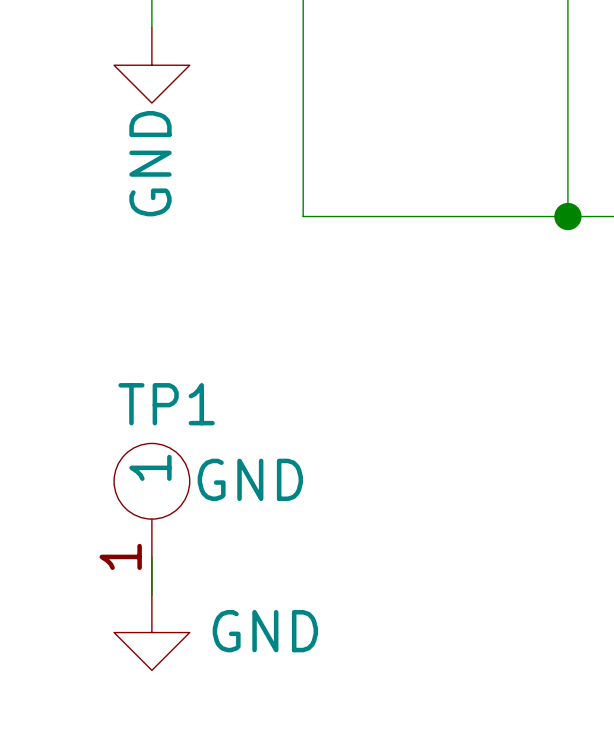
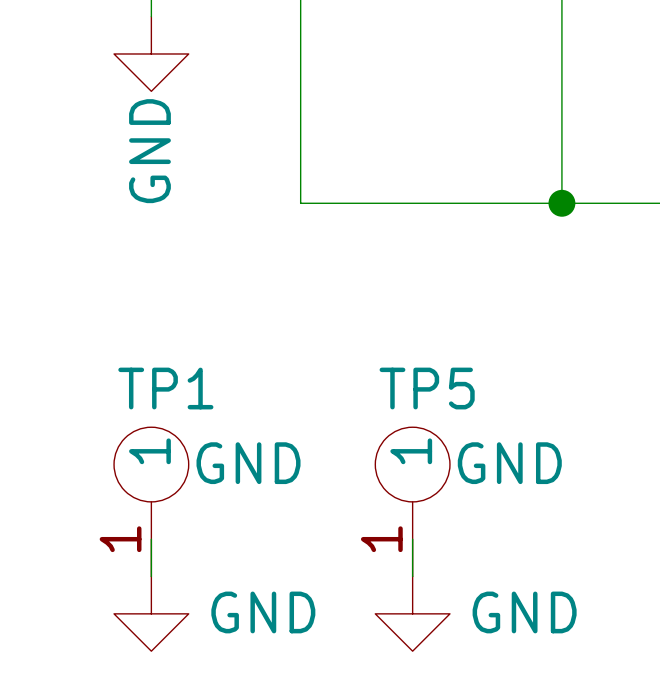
TP5: none -> GND (412, 501)
wire: none -> (412, 539) (412, 576)
power symbol: none -> GND (412, 613)

